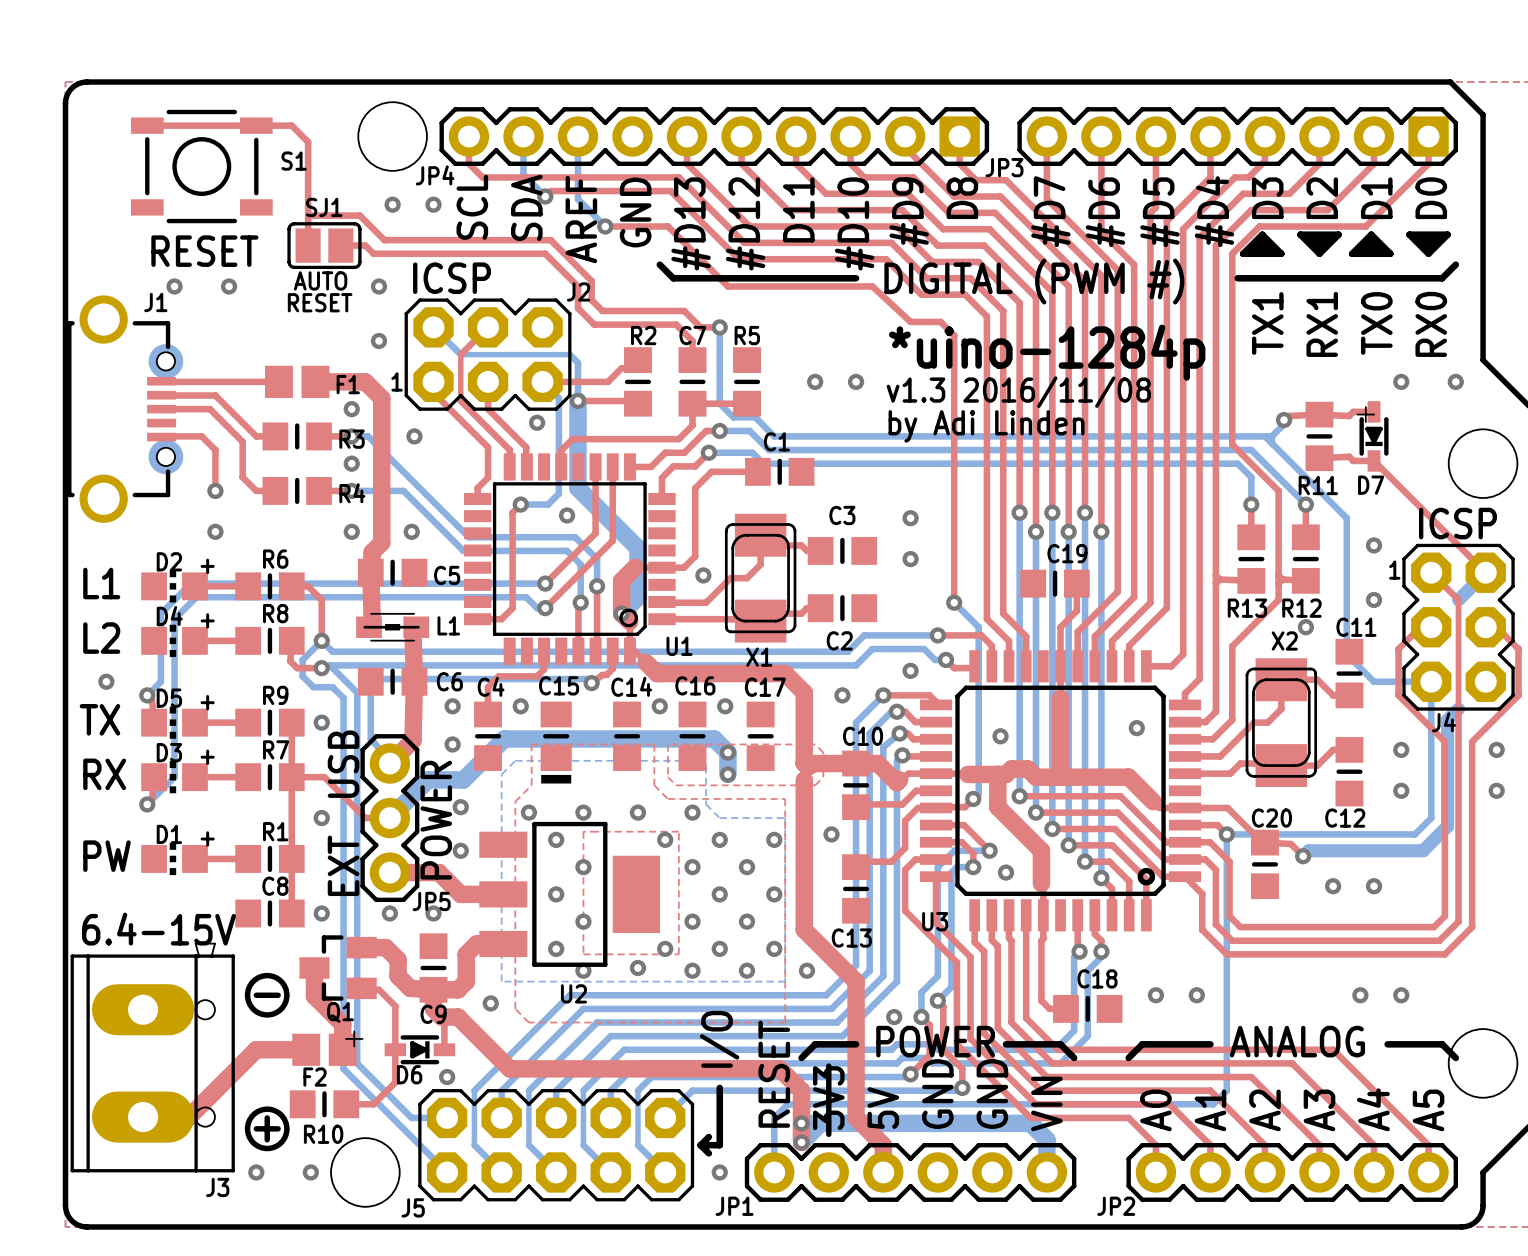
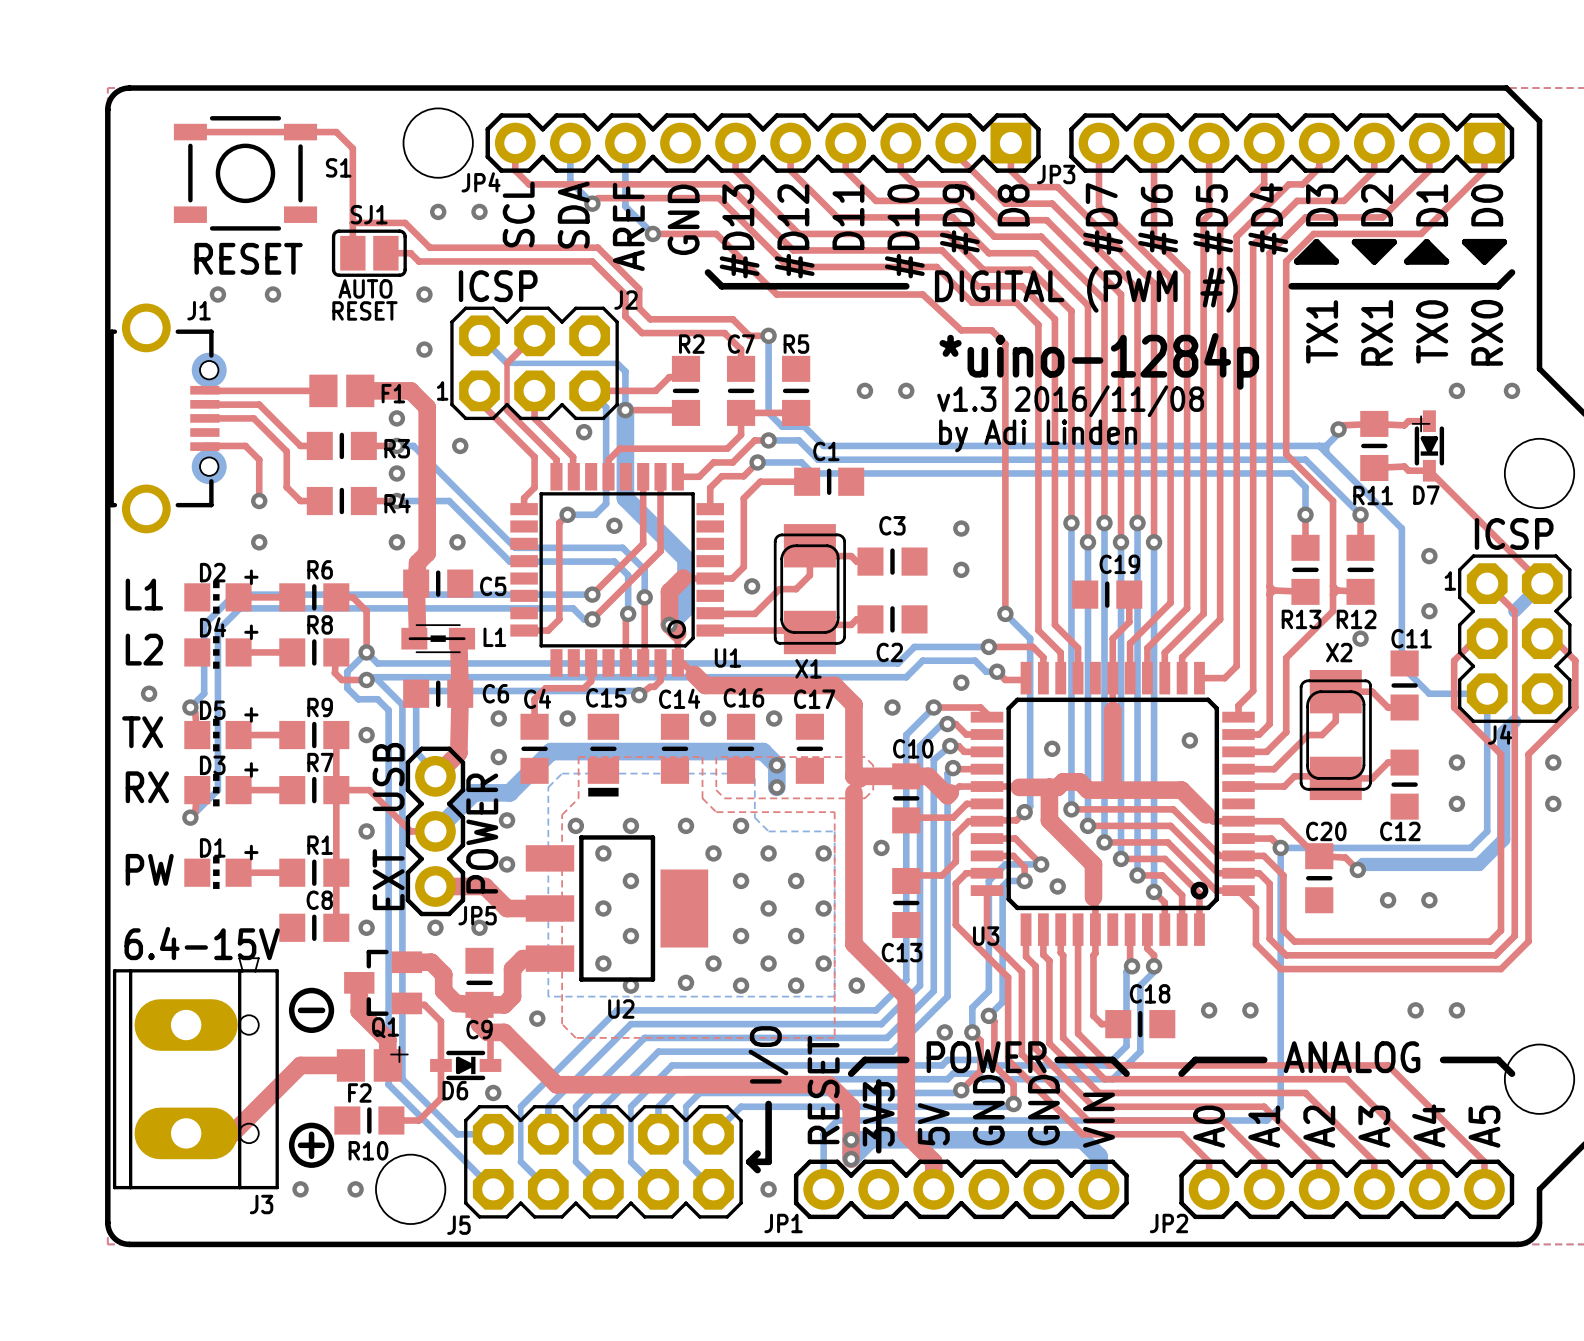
top zone outline: (583, 831) (678, 831) (678, 954) (583, 954) (583, 831) -> none

